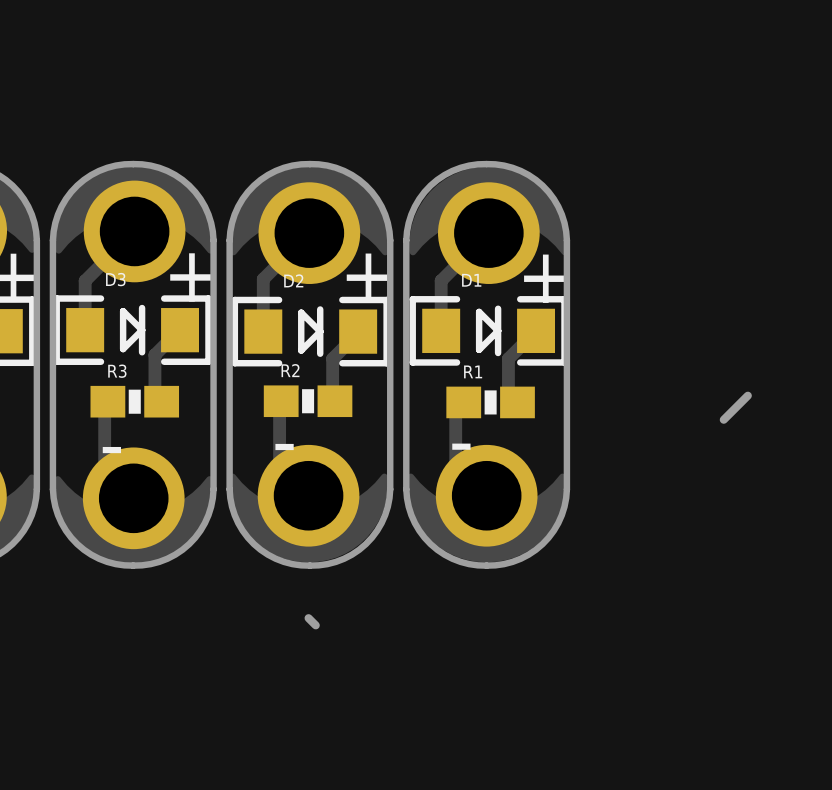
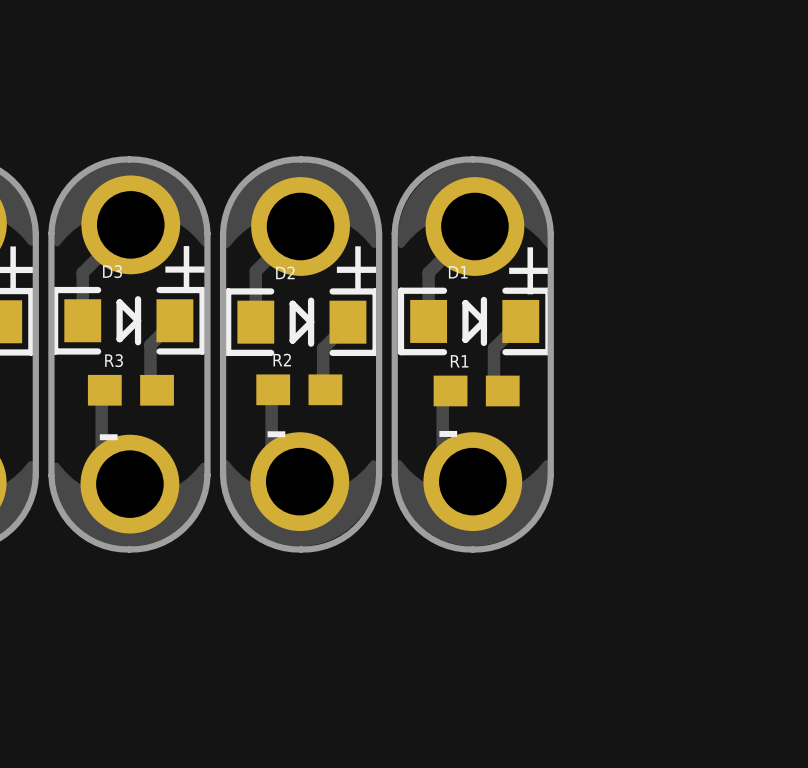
R3 footprint: [90, 385, 180, 418] -> [87, 374, 174, 406]
R2 footprint: [263, 385, 353, 418] -> [256, 374, 343, 406]
R1 footprint: [446, 386, 535, 419] -> [433, 375, 520, 407]
board edge: (747, 395) (723, 419) -> none
board edge: (308, 618) (315, 625) -> none

